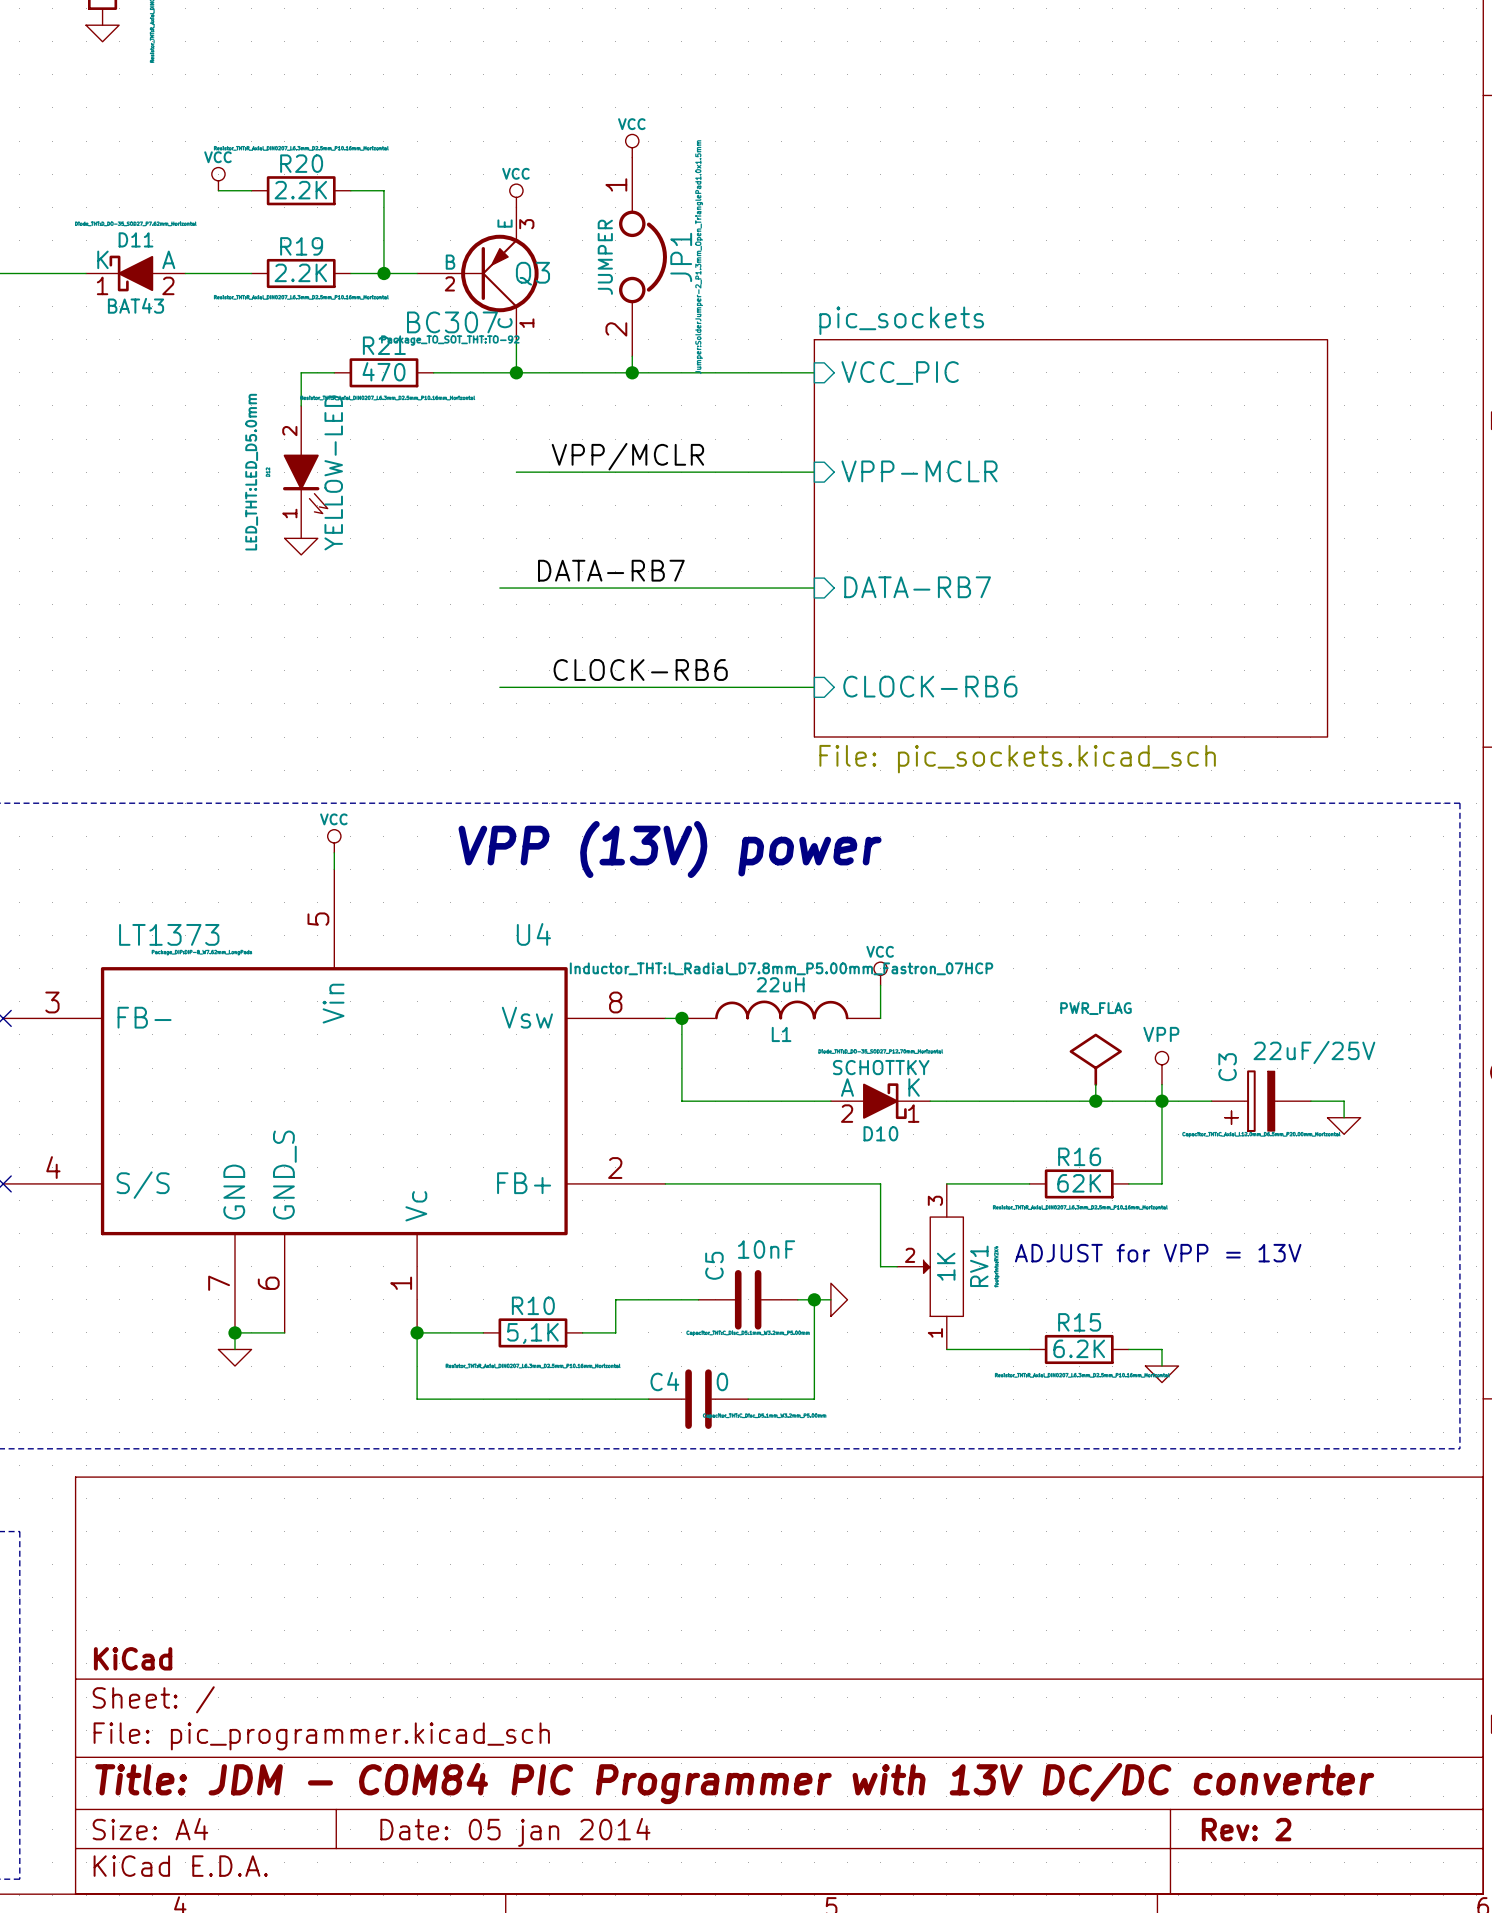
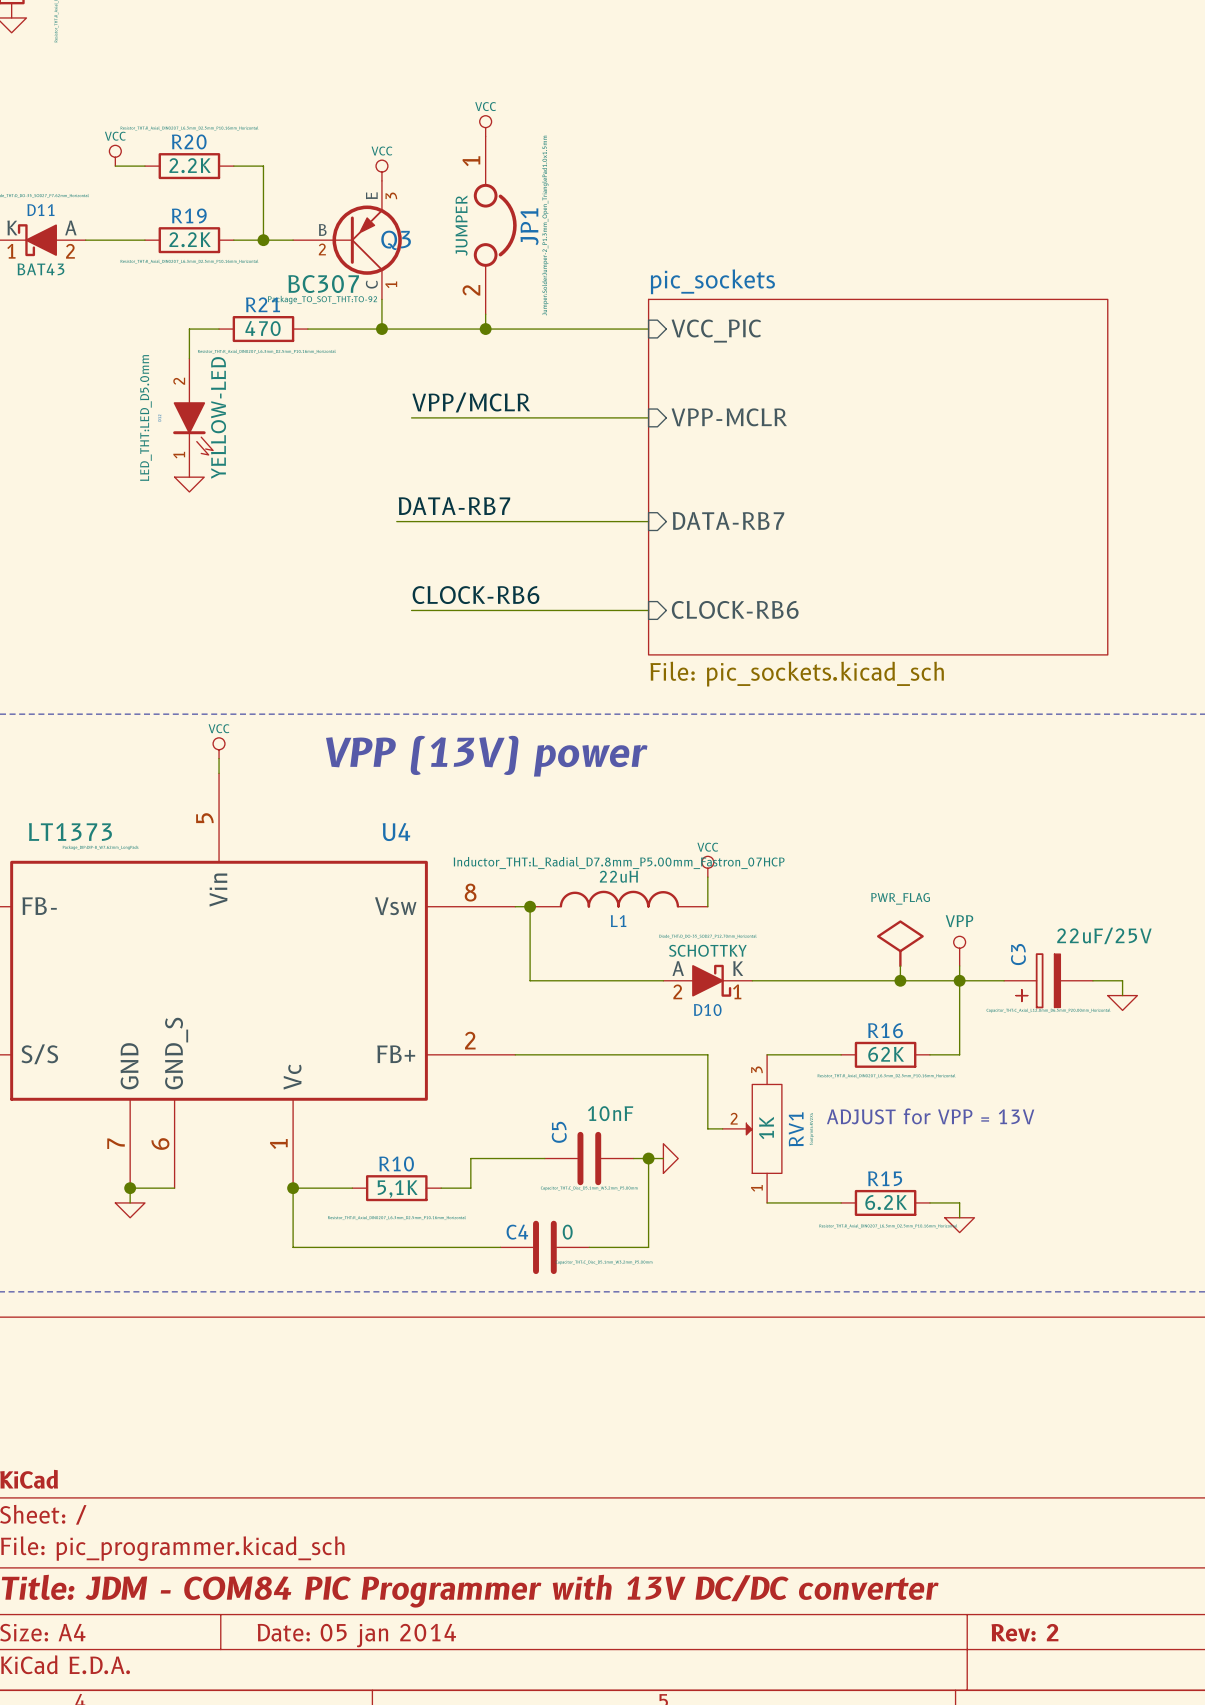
wire: (516, 472) (549, 472) -> none
wire: (499, 588) (532, 588) -> none
wire: (499, 687) (549, 687) -> none

